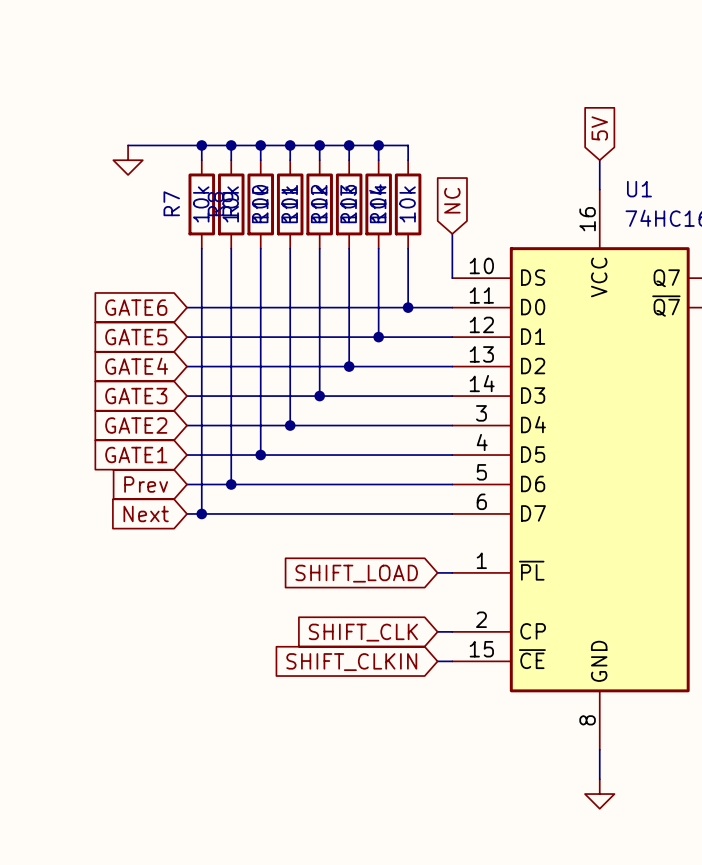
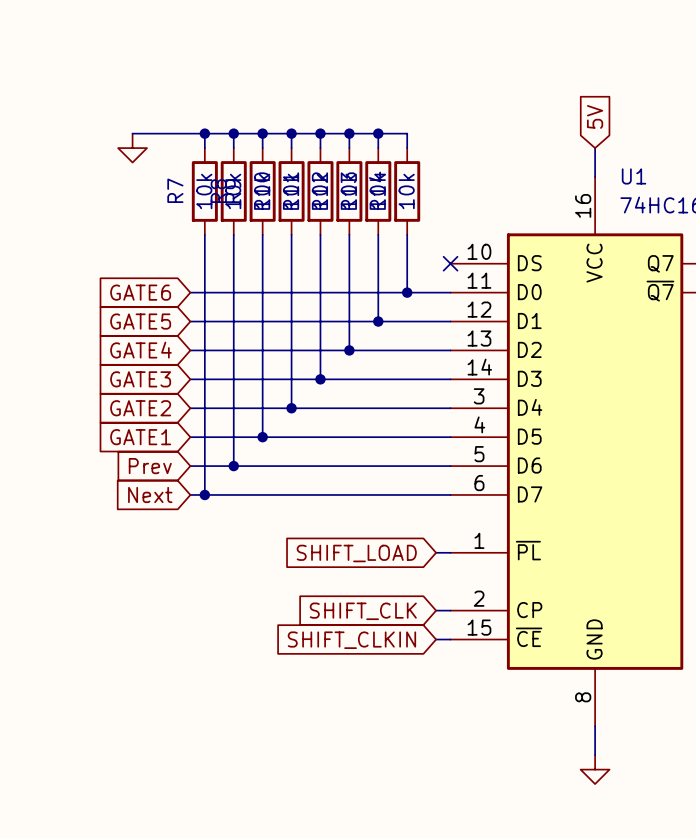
global label: NC (452, 200) -> none
wire: (452, 233) (452, 278) -> none
no-connect mark: none -> (450, 263)

